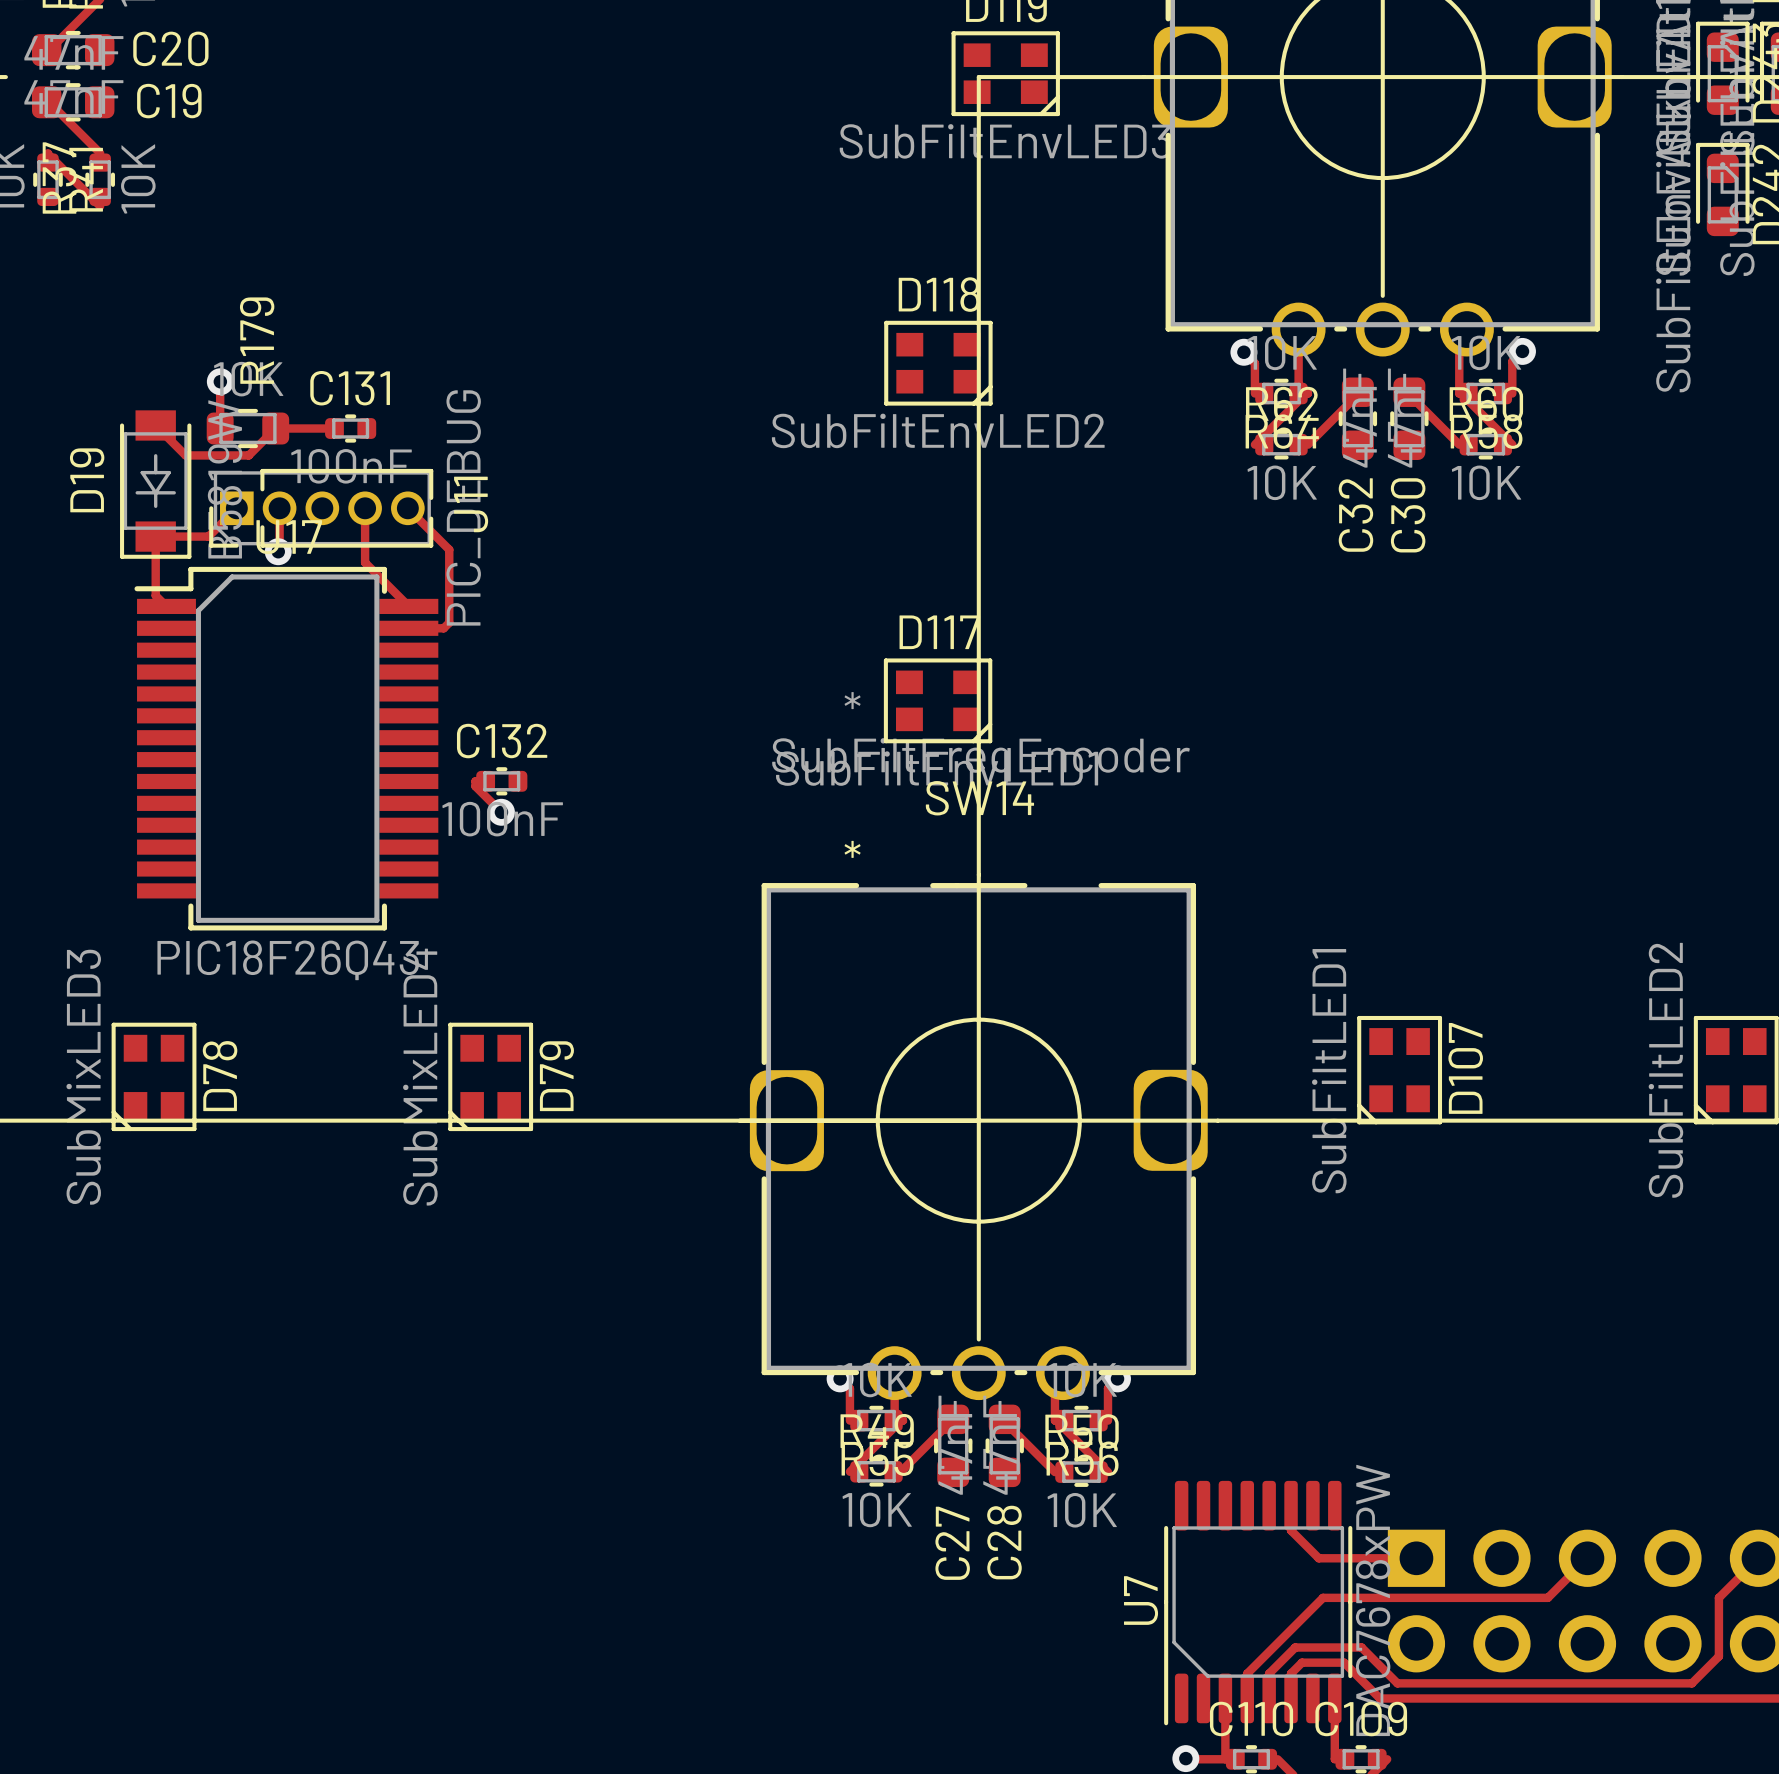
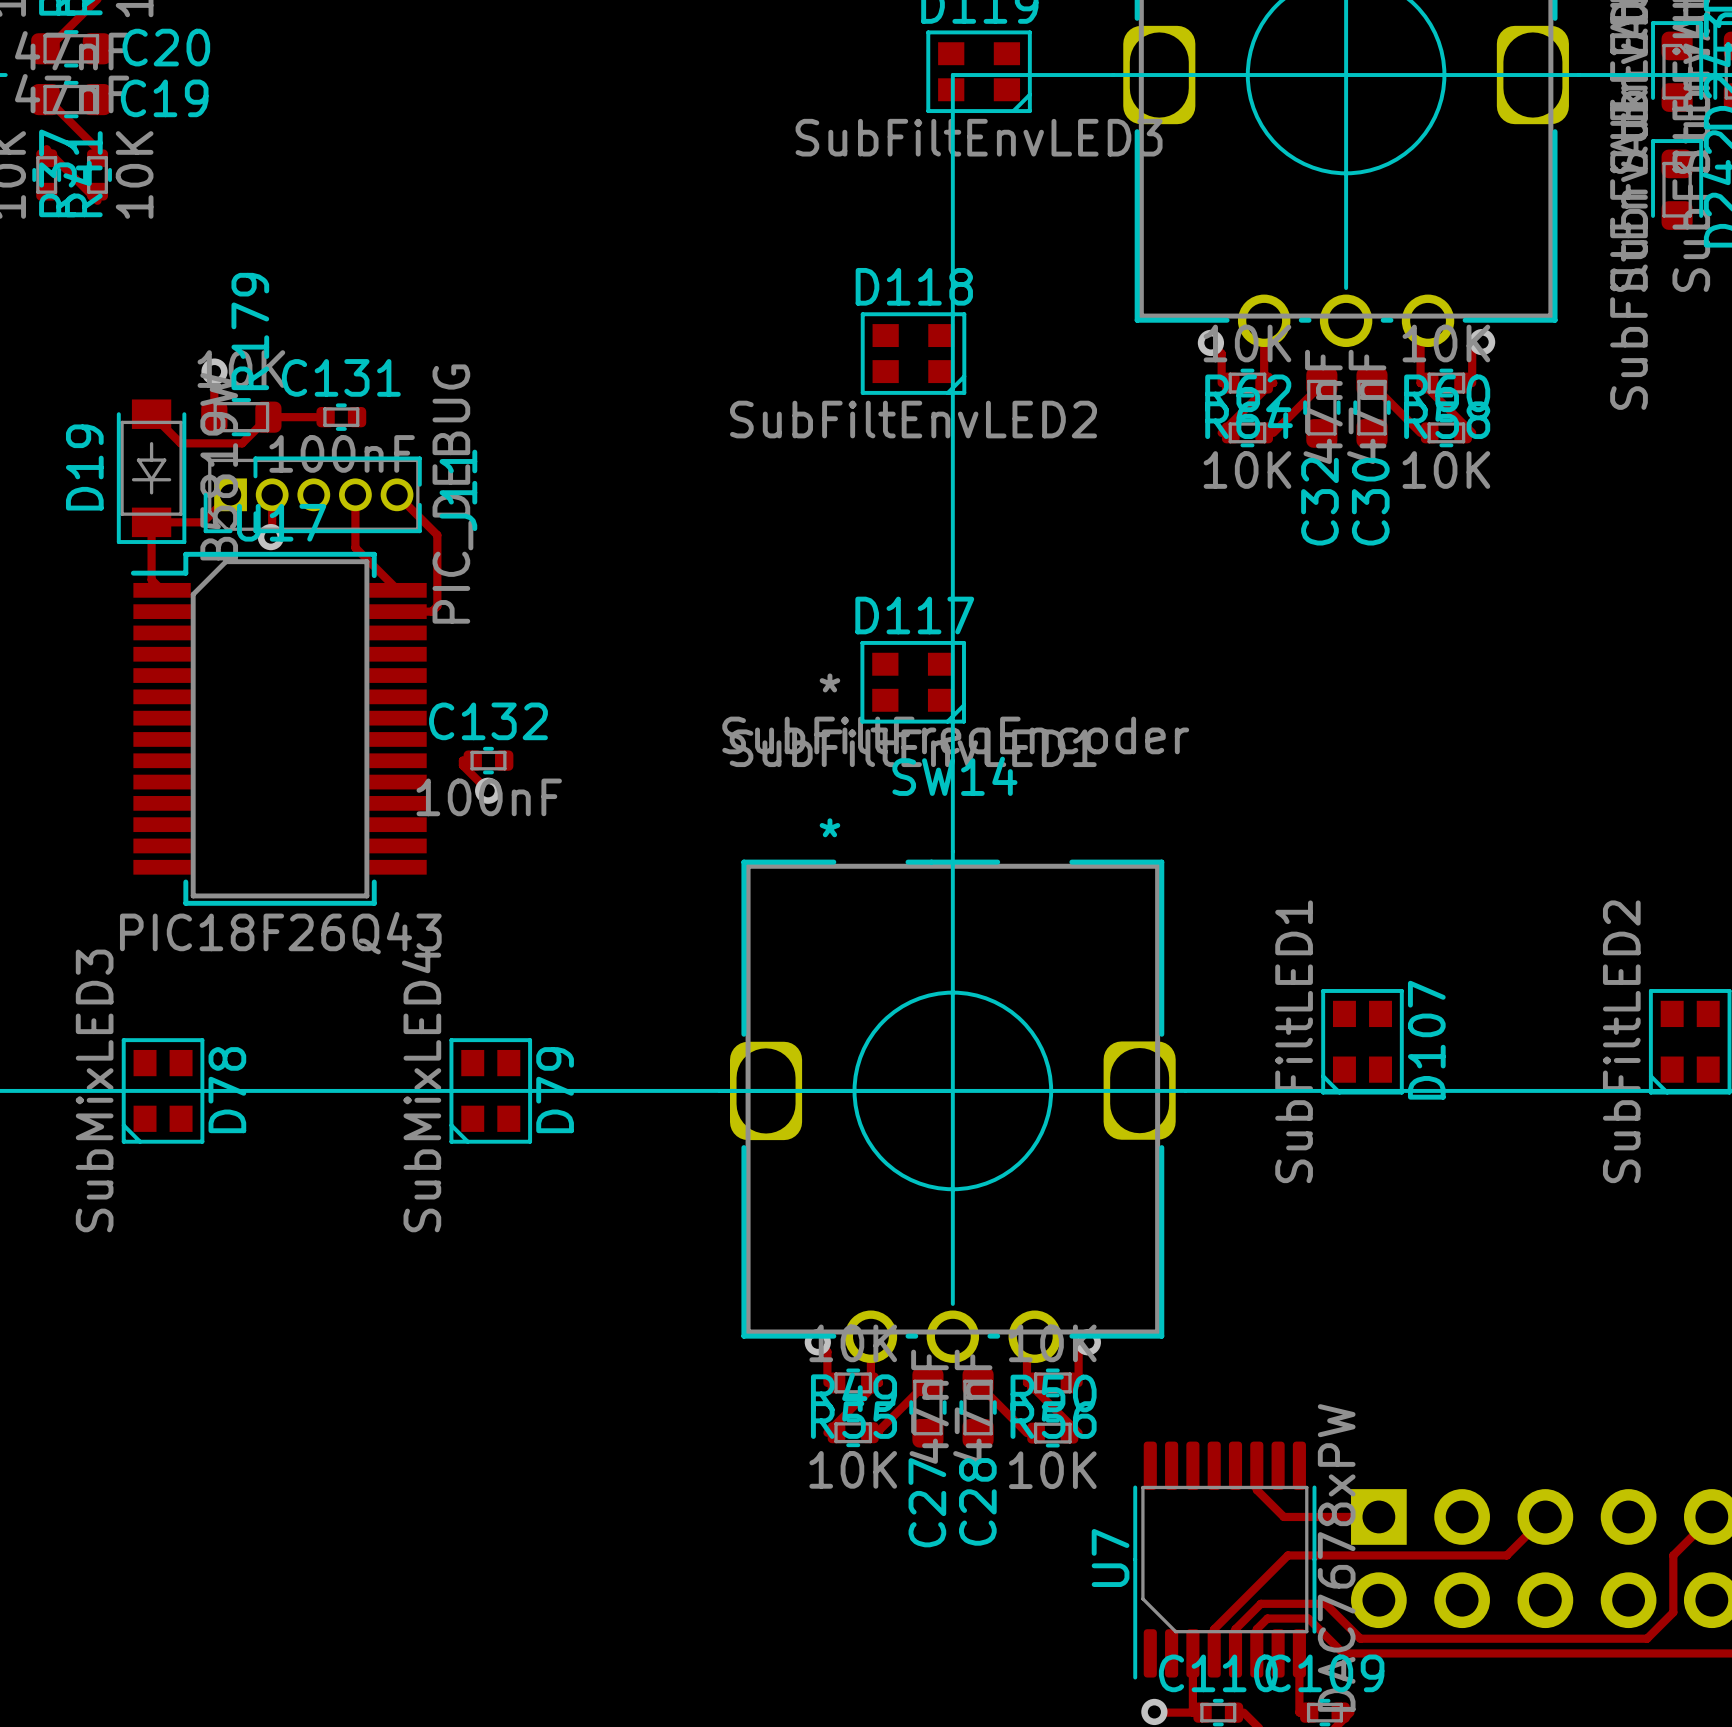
D78 position: (154, 1076) -> (163, 1090)
D79 position: (490, 1076) -> (490, 1090)

